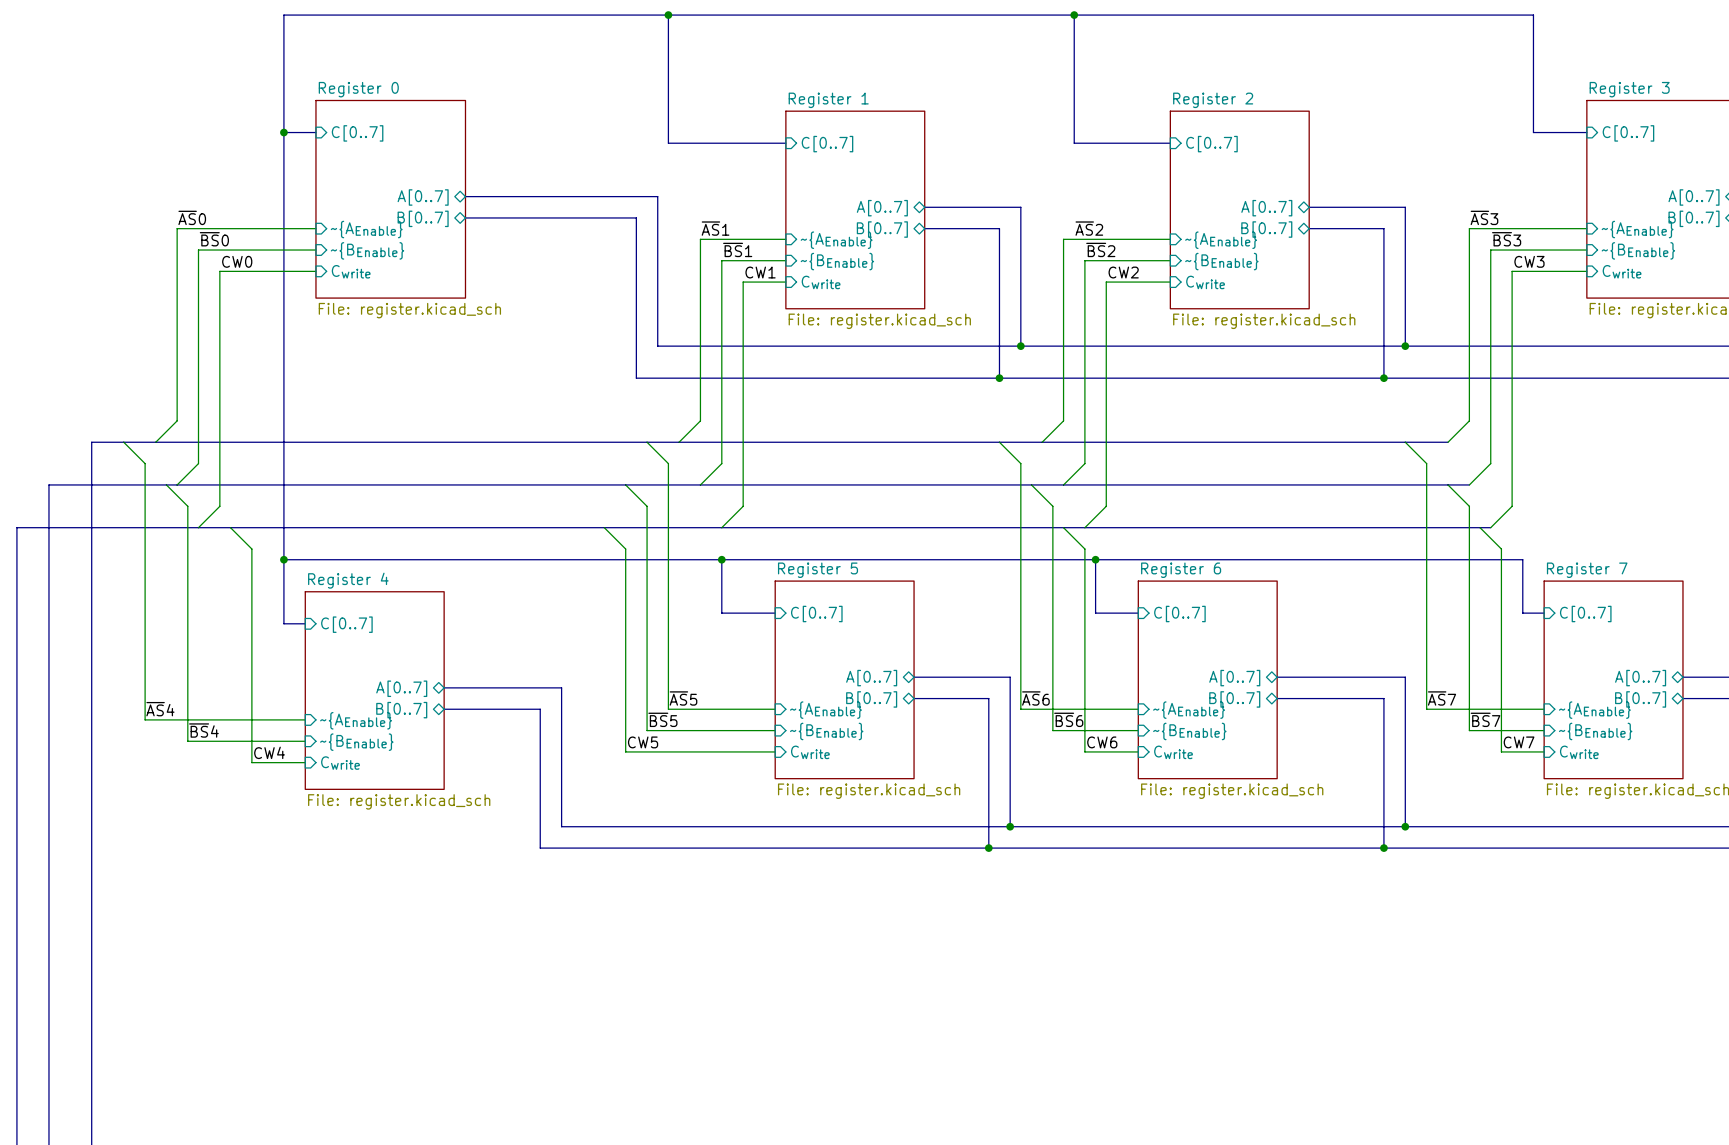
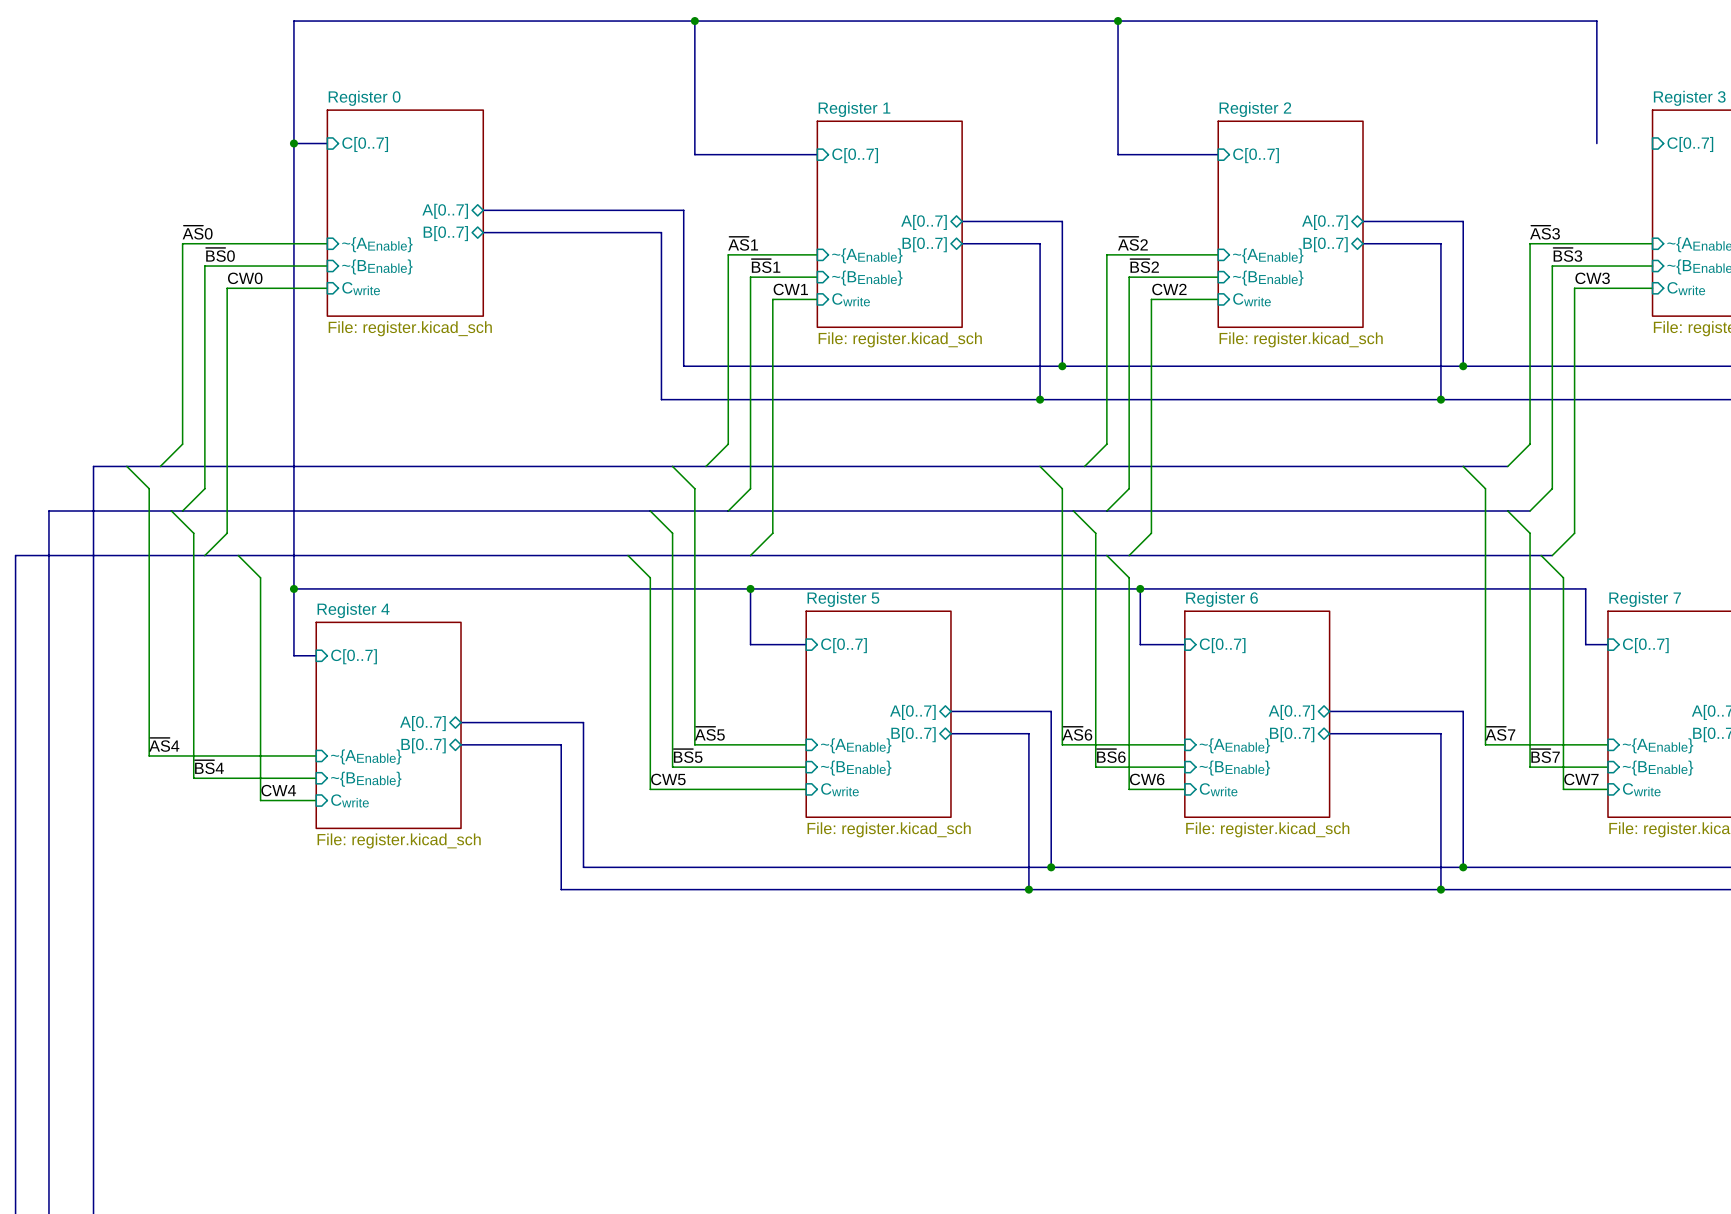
bus: (1533, 132) (1586, 132) -> none

